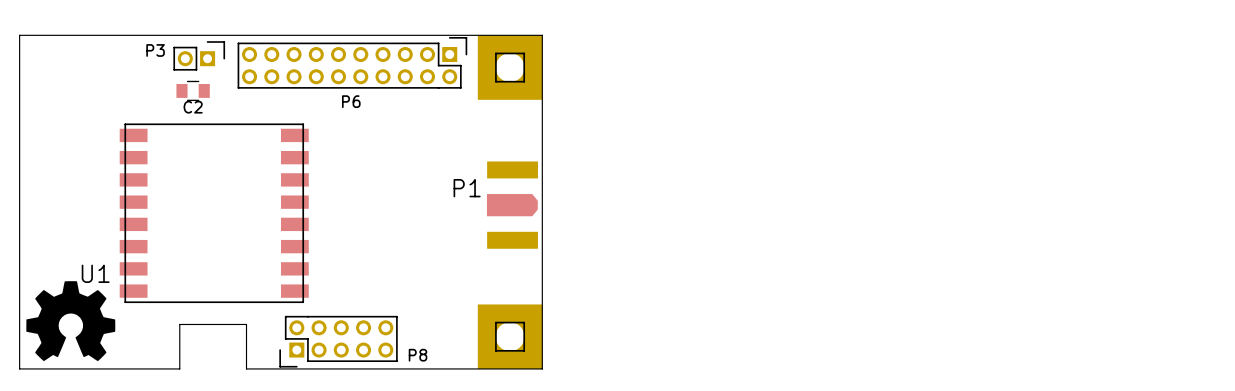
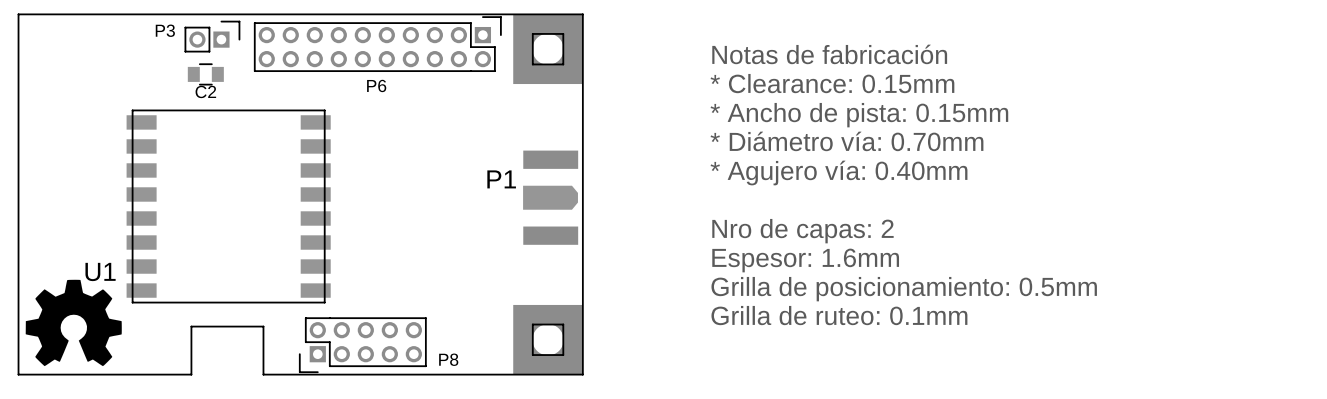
text: none -> Notas de fabricación (829, 54)
text: none -> * Clearance: 0.15mm (832, 83)
text: none -> * Ancho de pista: 0.15mm (859, 115)
text: none -> * Diámetro vía: 0.70mm (846, 141)
text: none -> * Agujero vía: 0.40mm (839, 172)
text: none -> Nro de capas: 2 (802, 231)
text: none -> Espesor: 1.6mm (805, 260)
text: none -> Grilla de posicionamiento: 0.5mm (904, 289)
text: none -> Grilla de ruteo: 0.1mm (839, 315)

